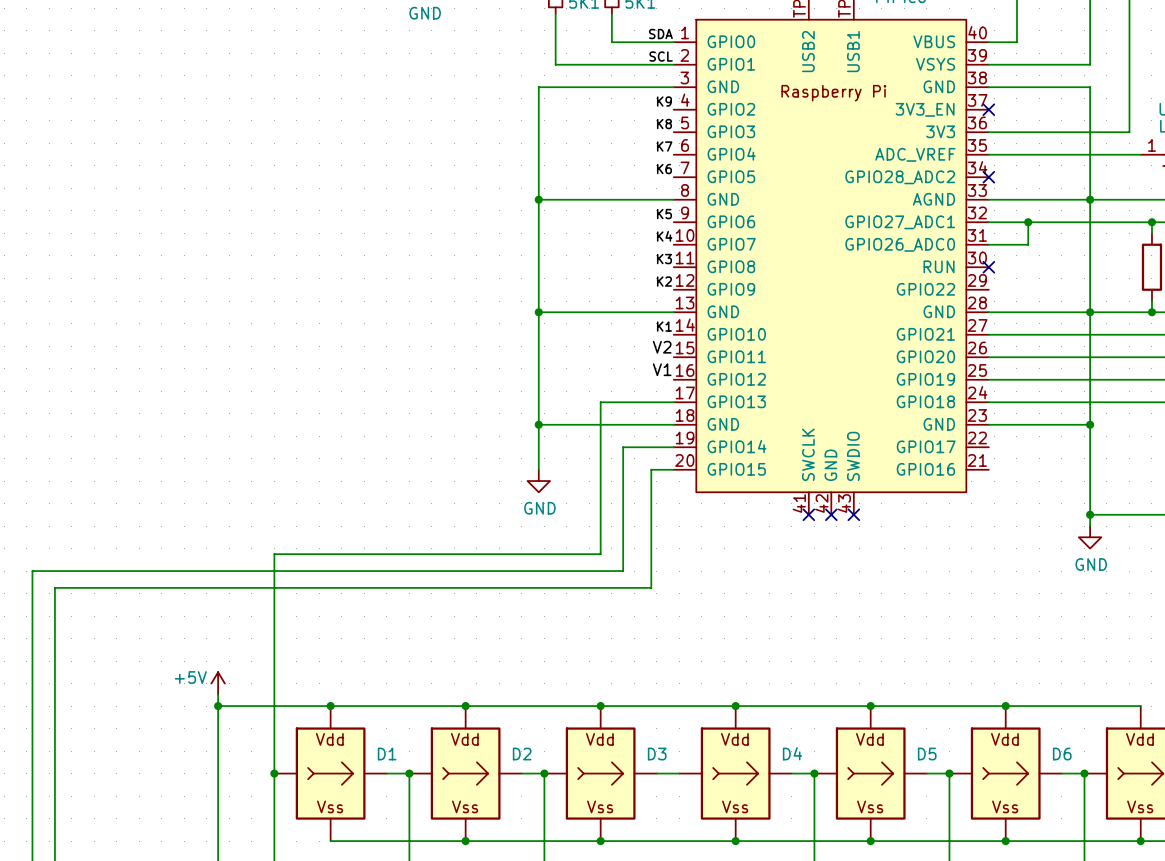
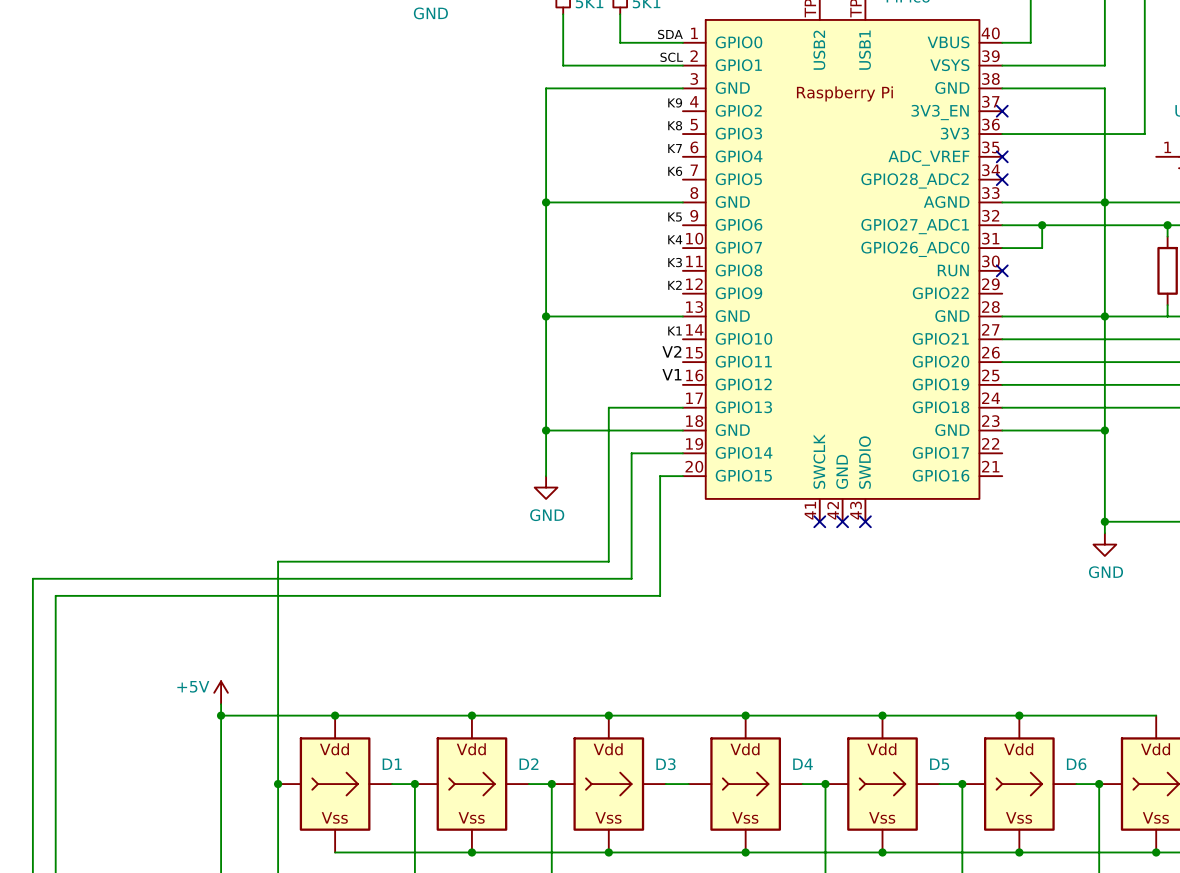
wire: (988, 154) (1140, 154) -> none
no-connect mark: none -> (1002, 156)
junction: (1151, 312) -> none

